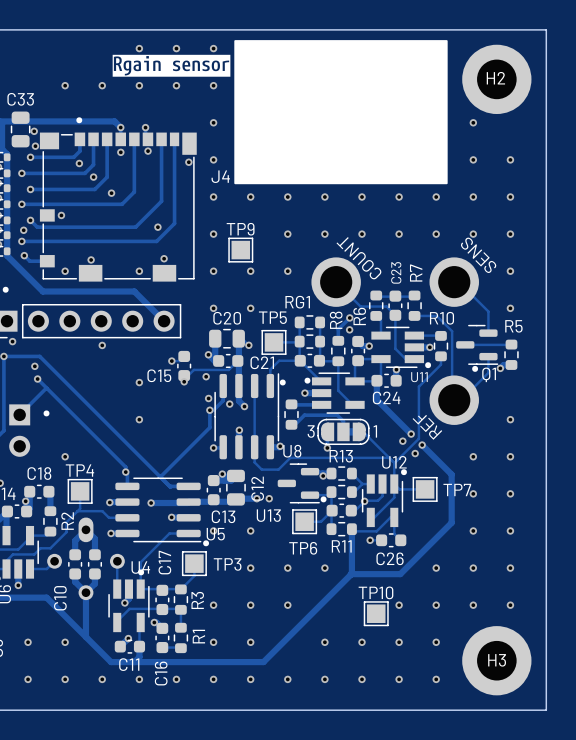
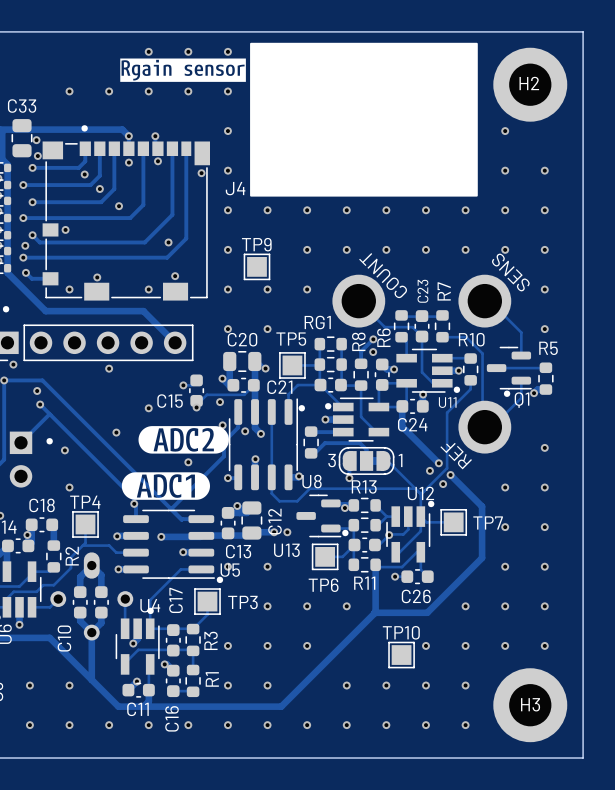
drawing: none -> [138, 426, 229, 454]
via: none -> (116, 432)
via: none -> (64, 450)
via: none -> (188, 462)
drawing: none -> [121, 472, 211, 500]

